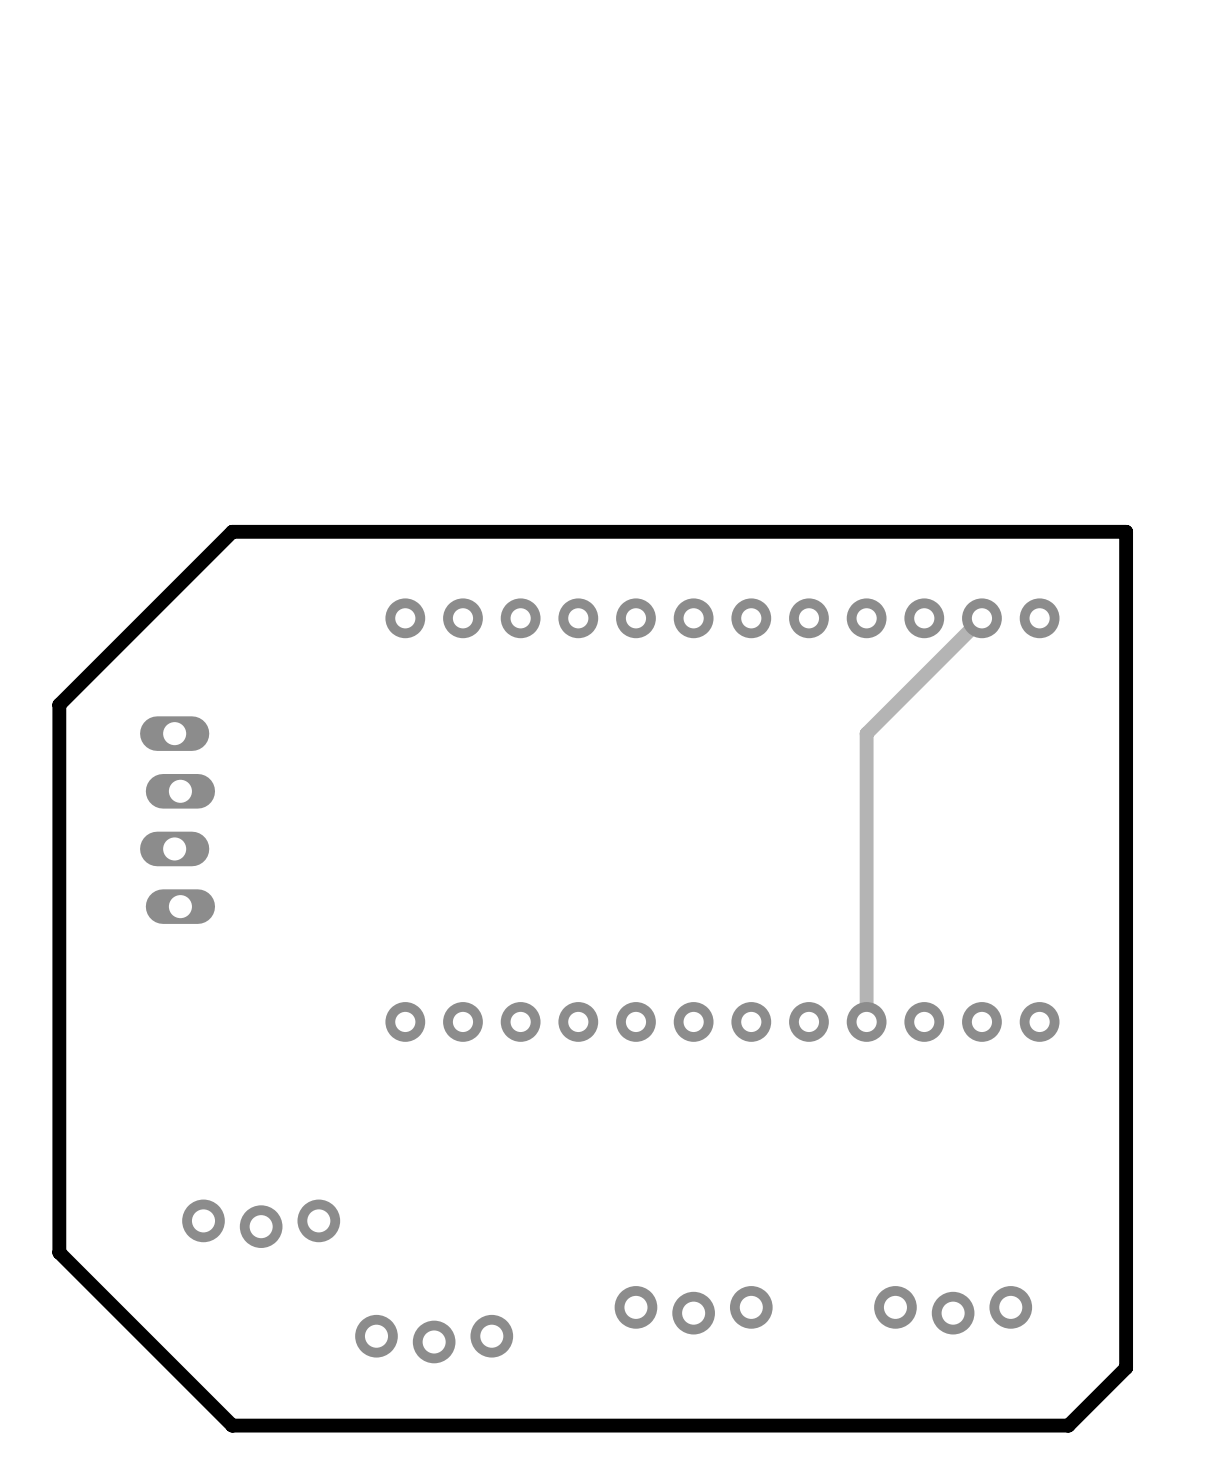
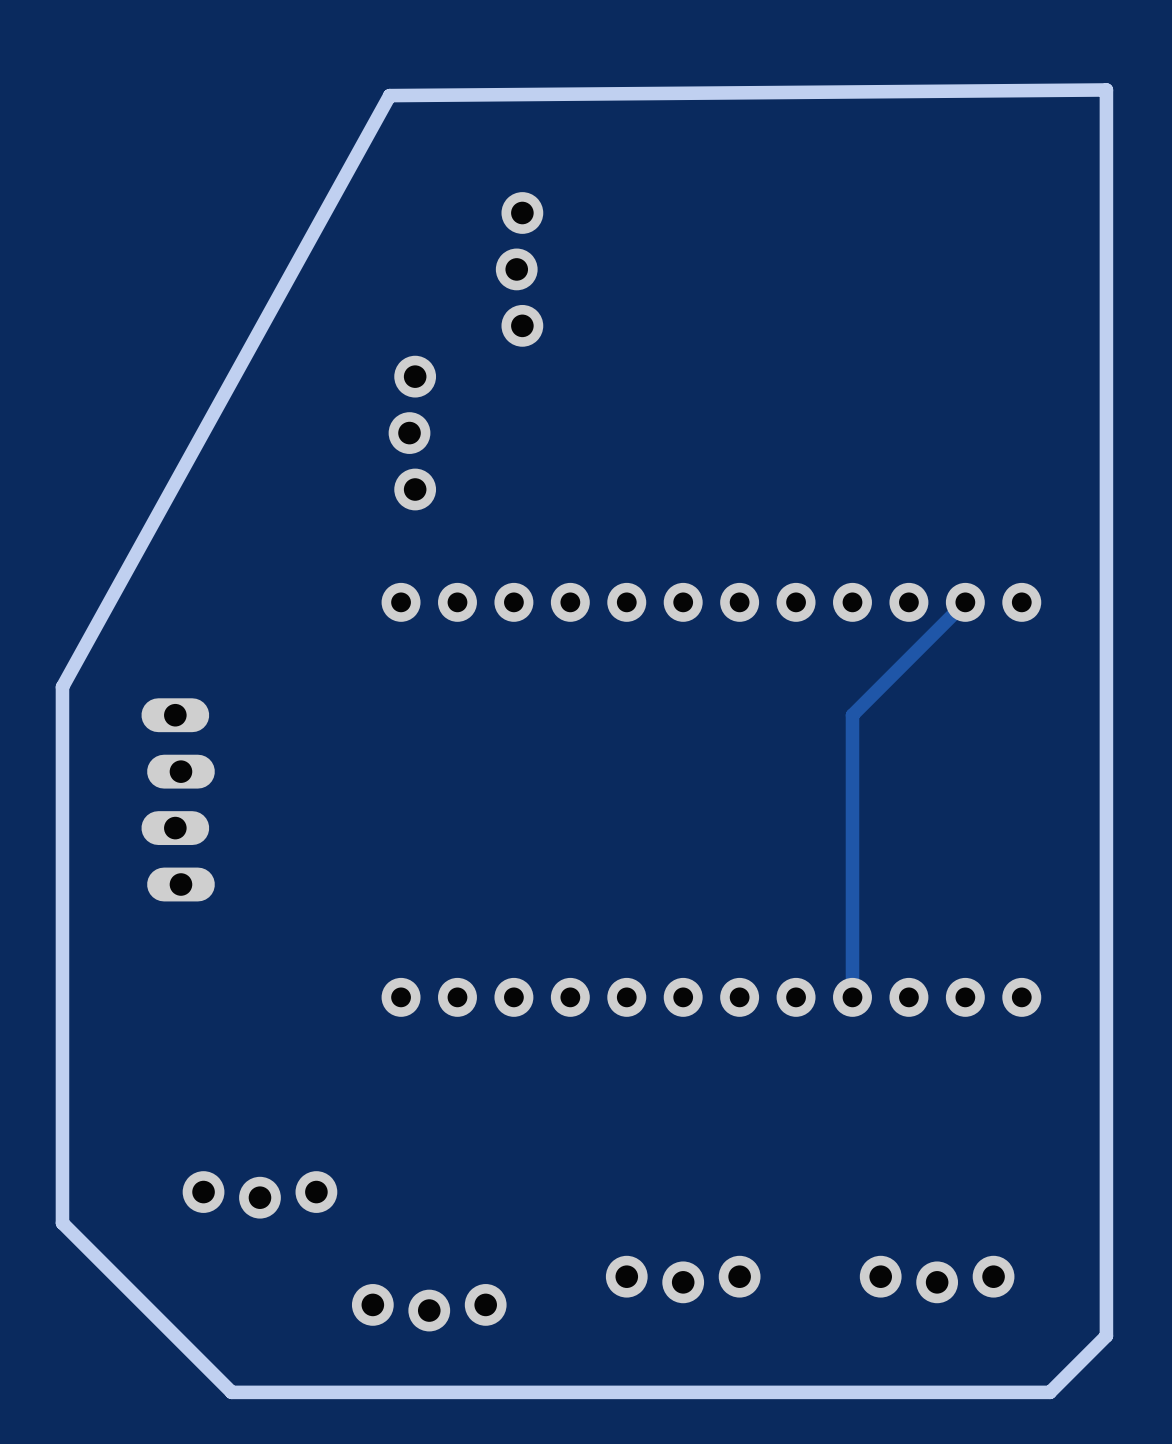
part: none -> (519, 269)
part: none -> (412, 433)
board edge: (1126, 531) (232, 531) (59, 704) -> (1106, 517) (1106, 89) (389, 95) (62, 687)

